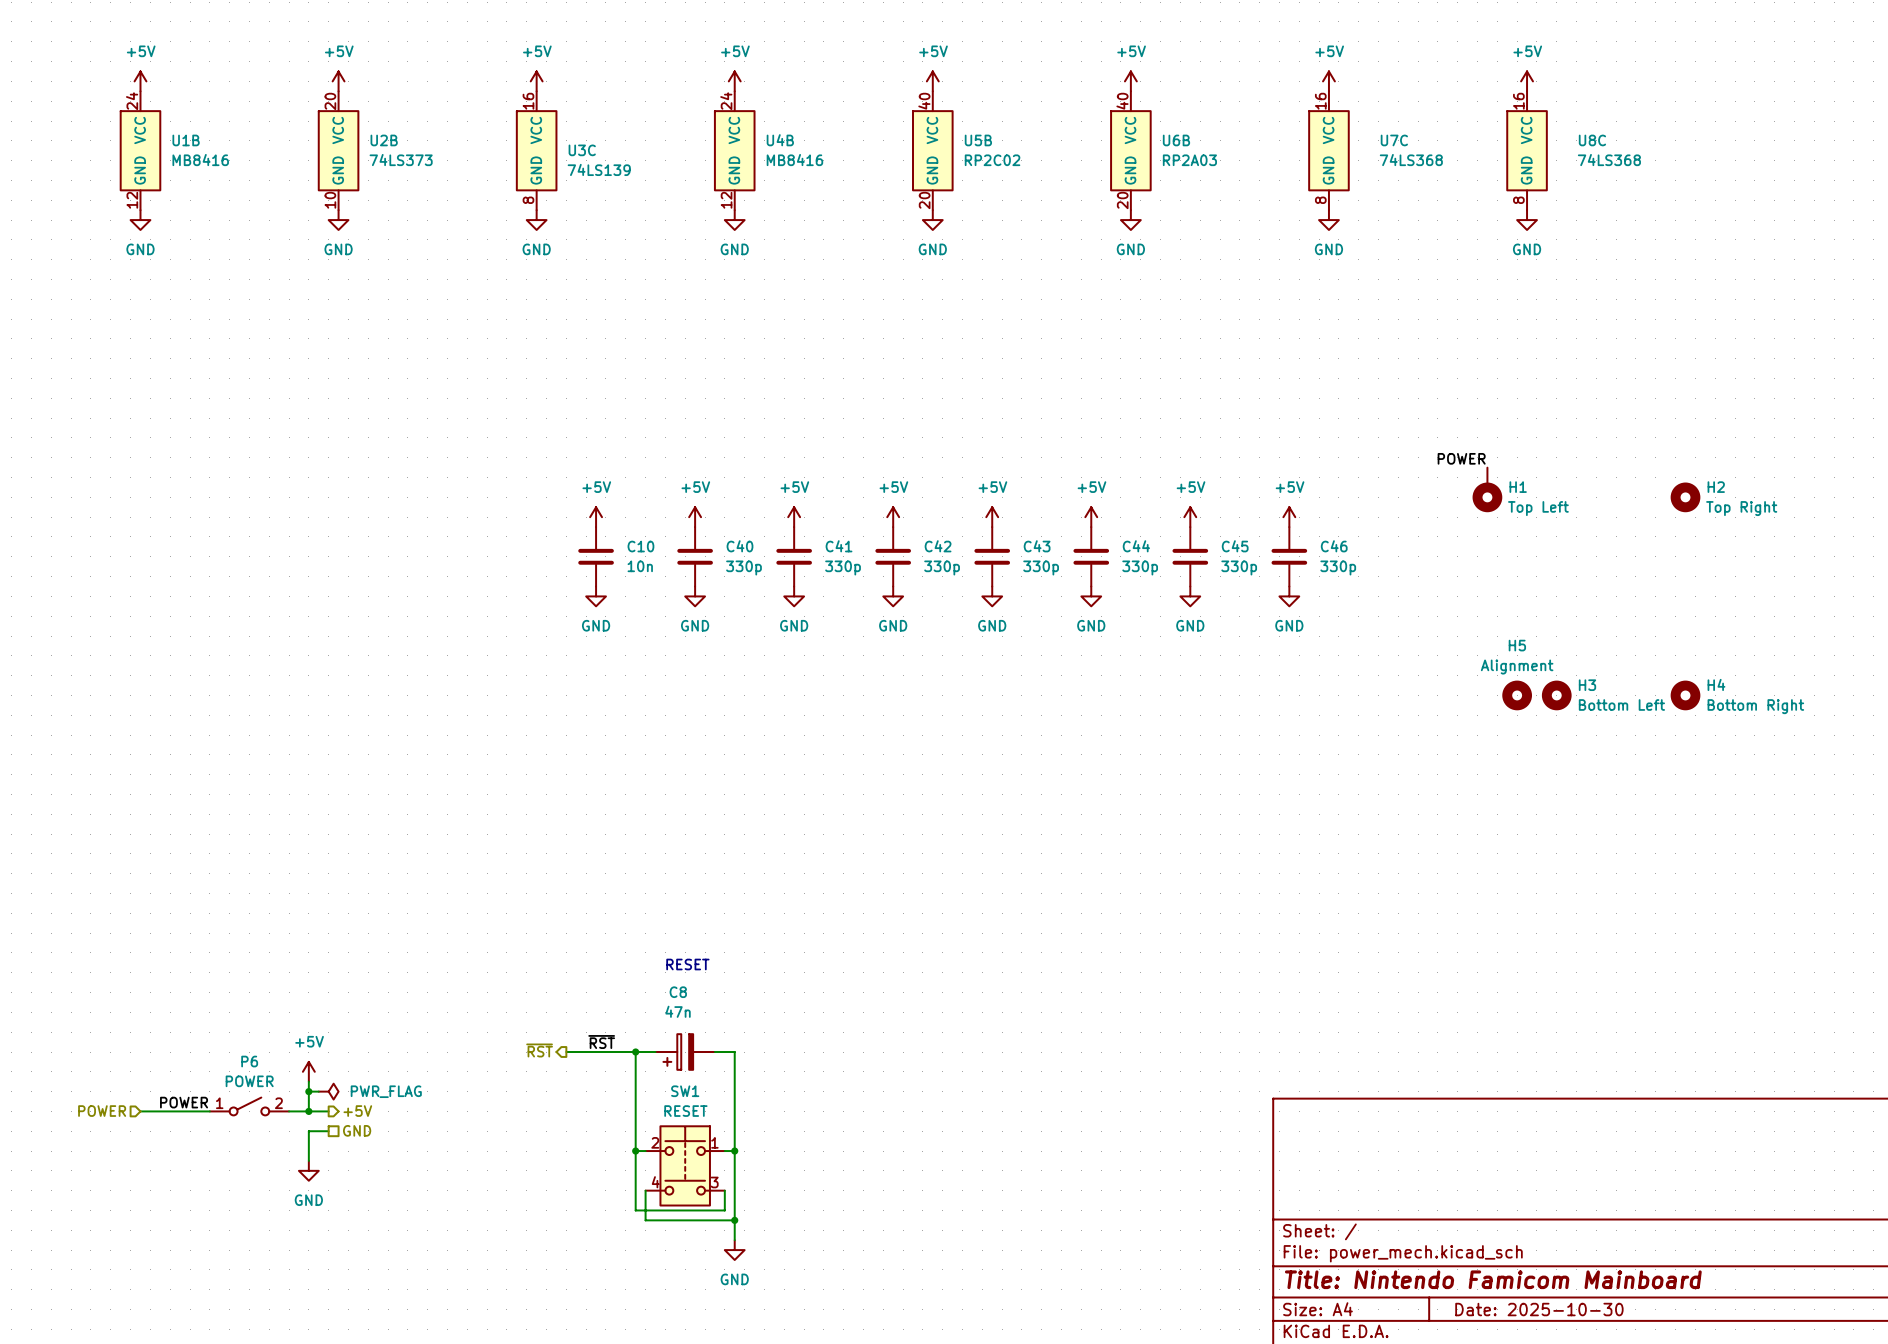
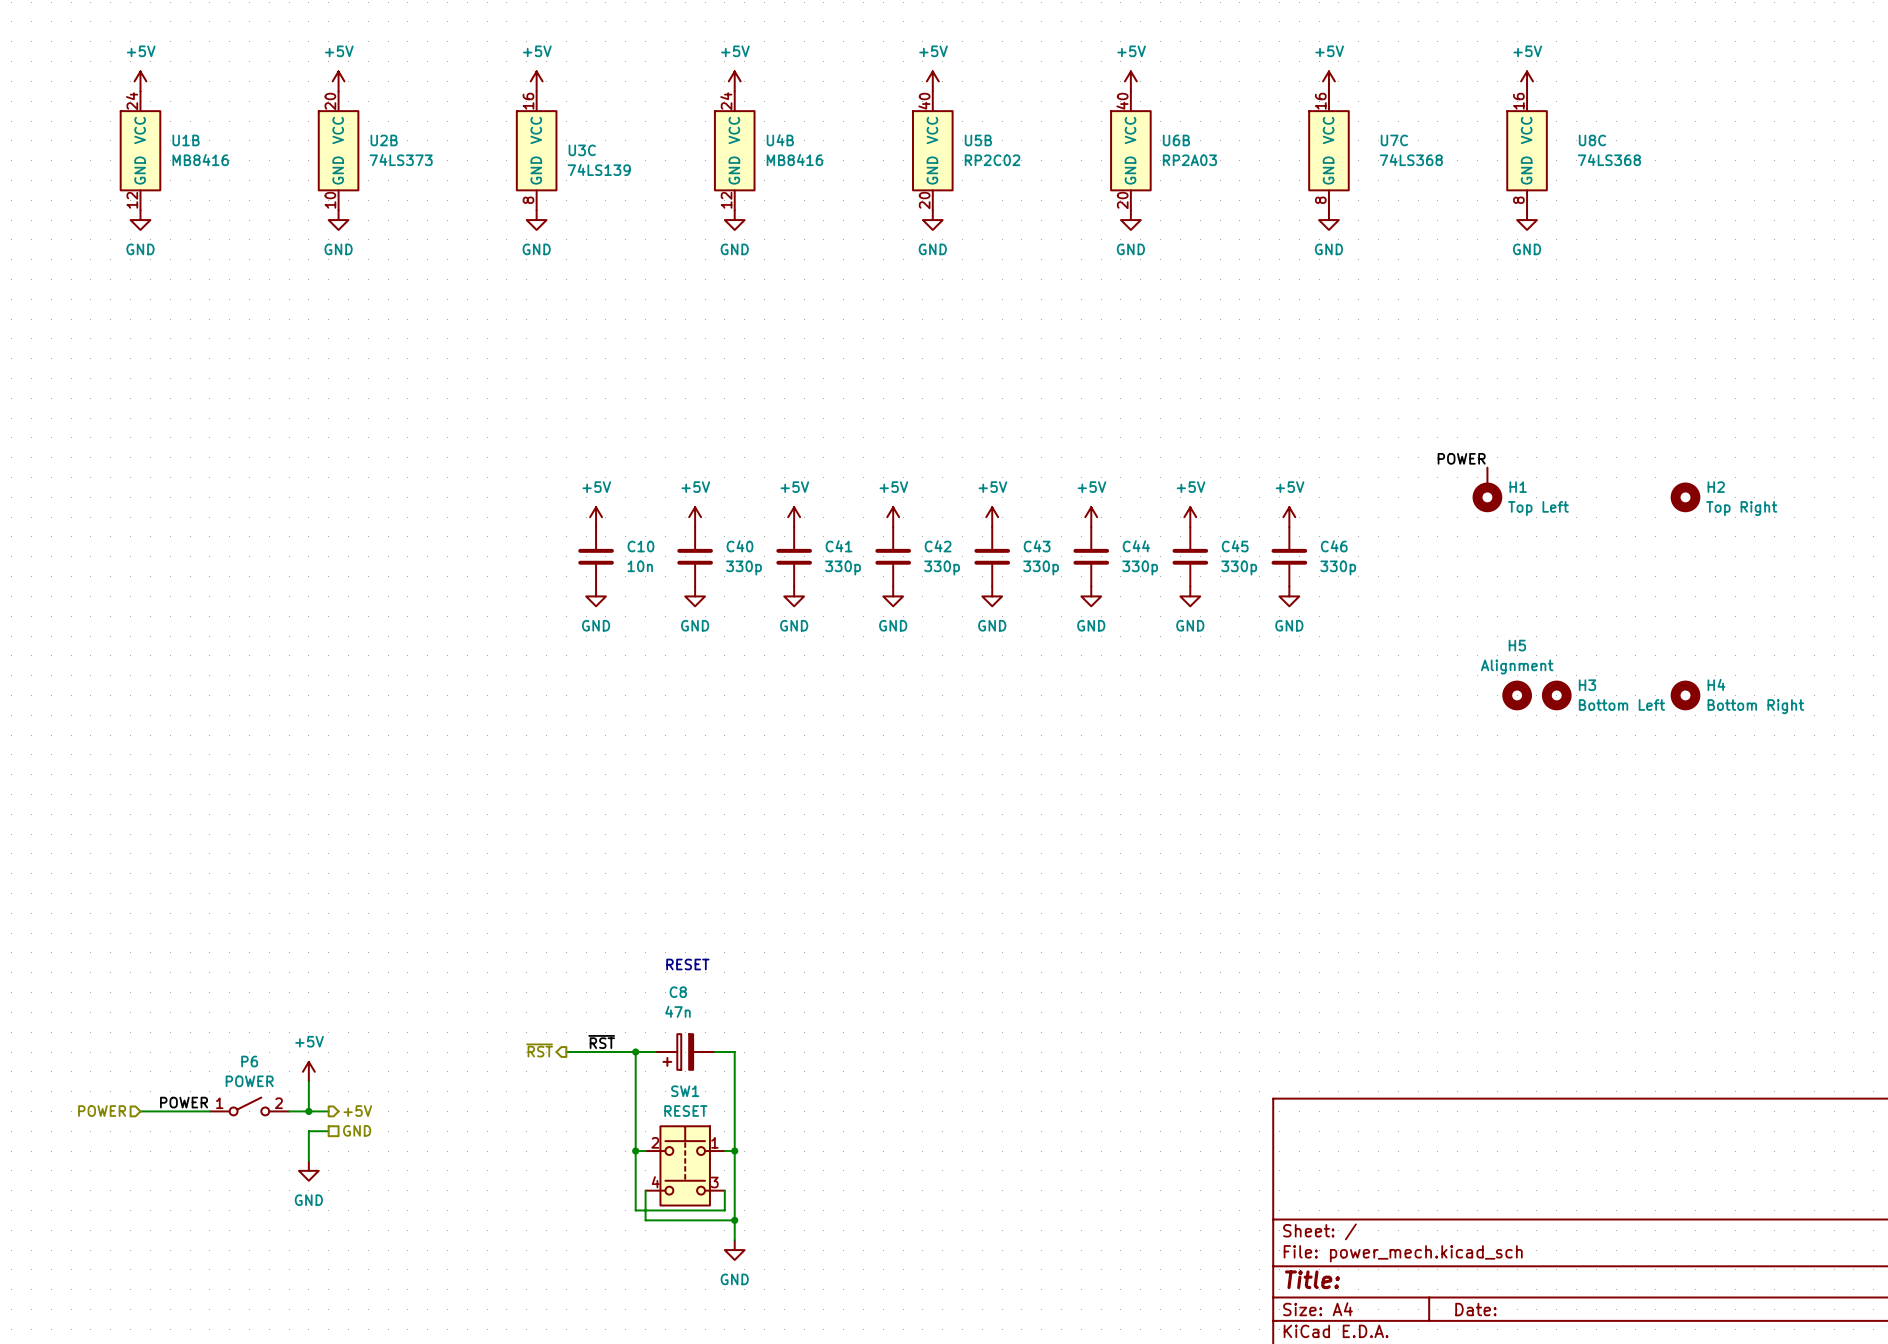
wire: (308, 1091) (318, 1091) -> none
junction: (308, 1091) -> none
power symbol: PWR_FLAG (328, 1091) -> none
title block: Title: Nintendo Famicom Mainboard (1493, 1279) -> Title: (1312, 1279)
title block: Date: 2025-10-30 (1539, 1309) -> Date: (1475, 1309)

